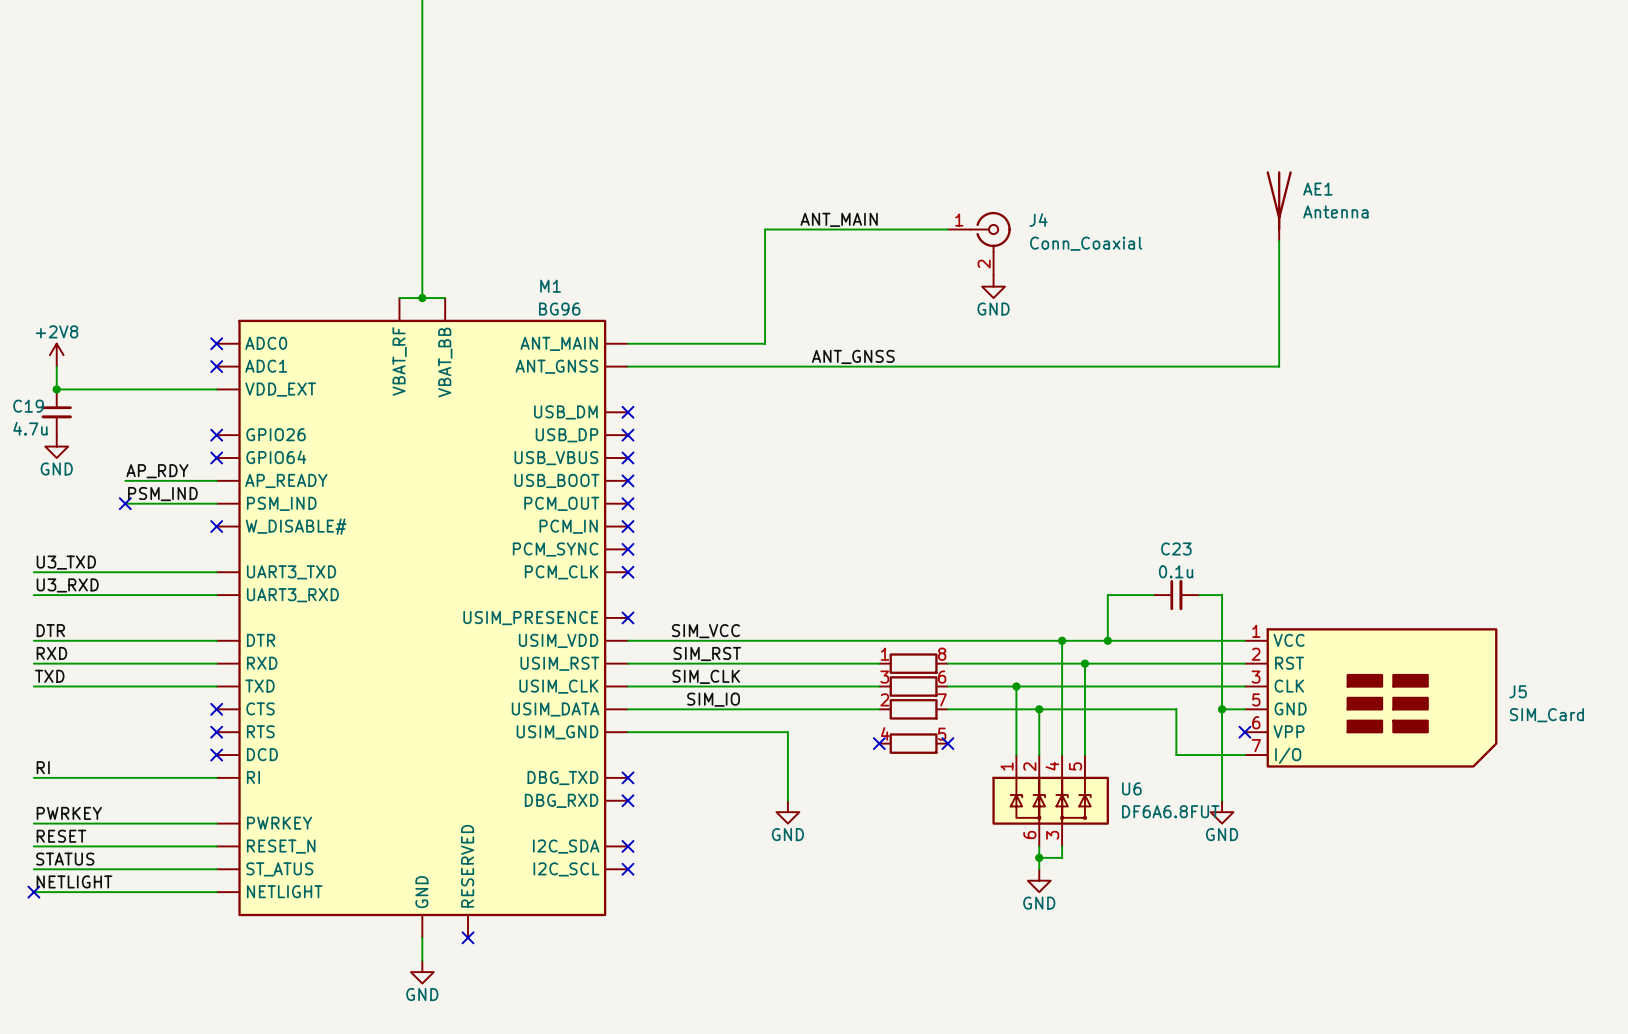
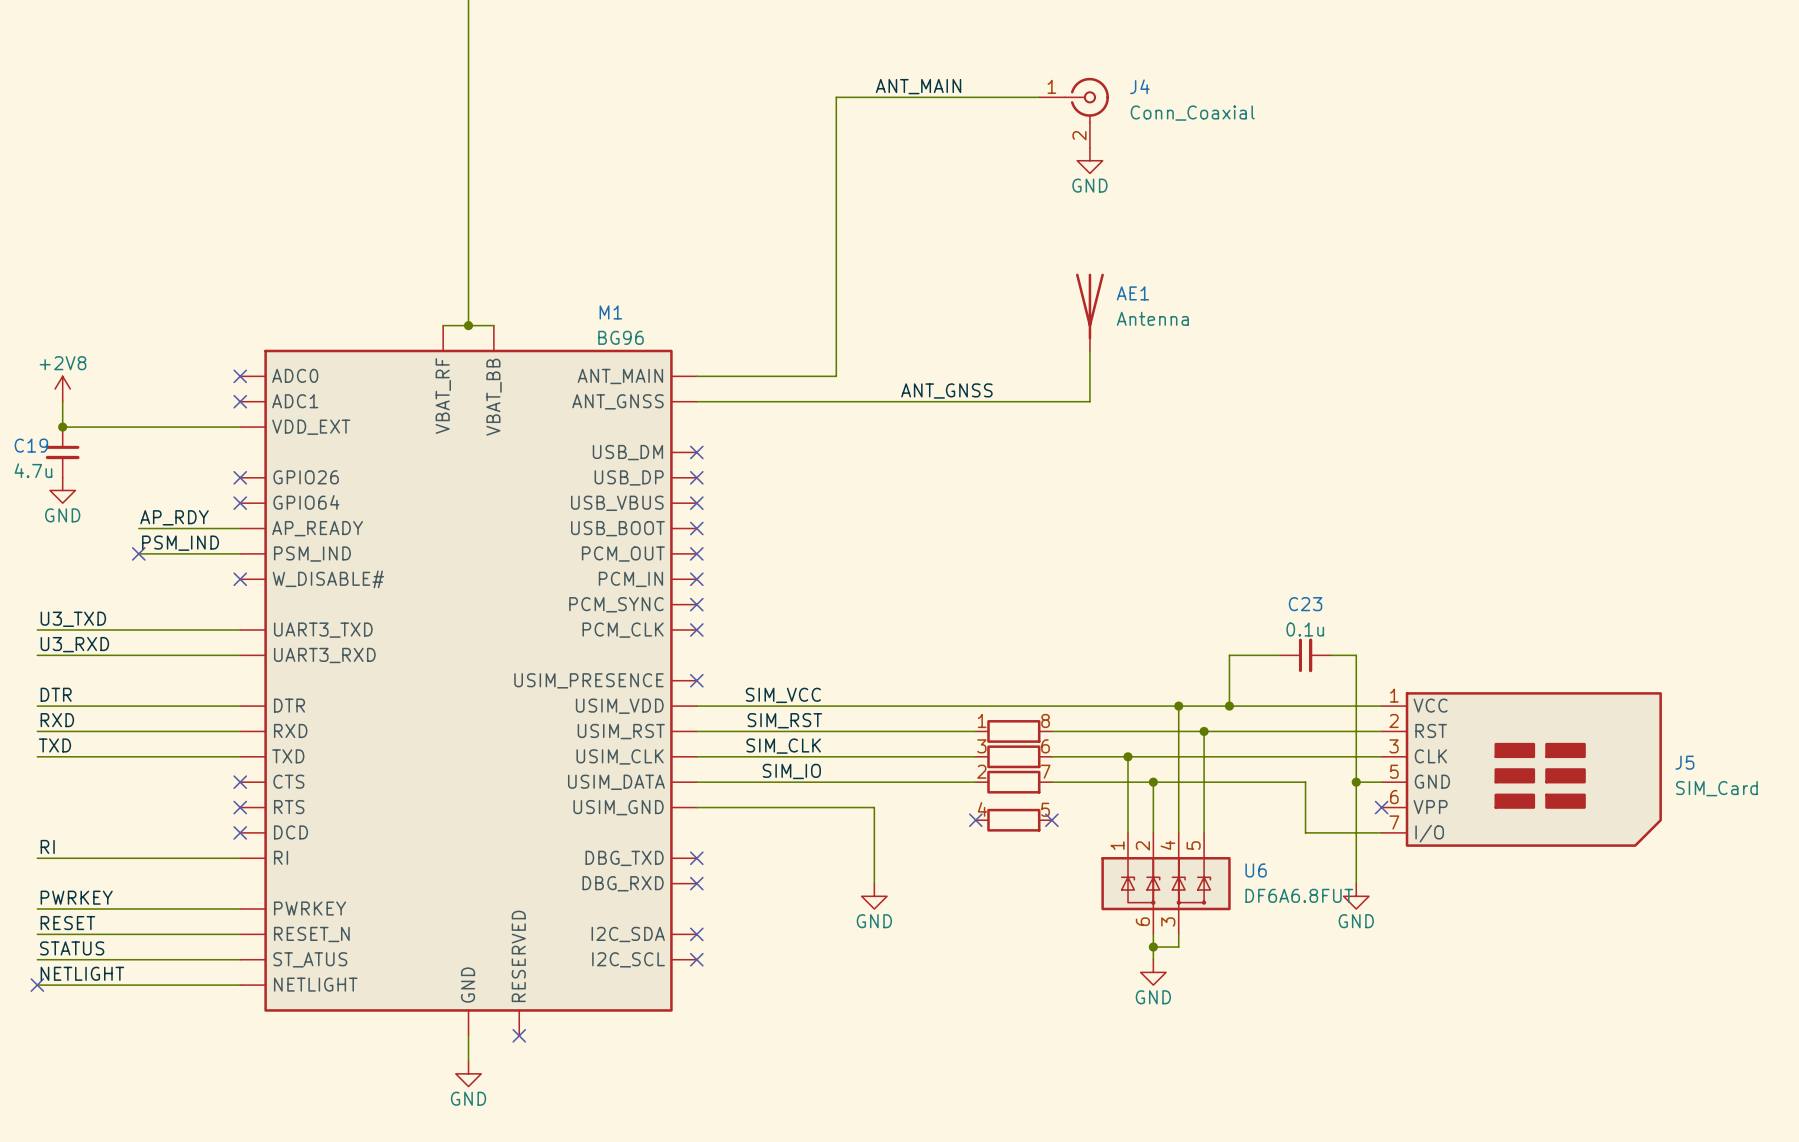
AE1 position: (1279, 206) -> (1089, 312)
label position: ANT_MAIN (839, 219) -> ANT_MAIN (918, 86)
wire: (947, 229) (765, 229) (765, 343) (753, 343) -> (1039, 97) (836, 97) (836, 376)
wire: (1279, 240) (1279, 366) (982, 366) -> (1089, 350) (1089, 401)
J4 position: (979, 243) -> (1074, 112)
power symbol position: GND (993, 286) -> GND (1089, 160)

